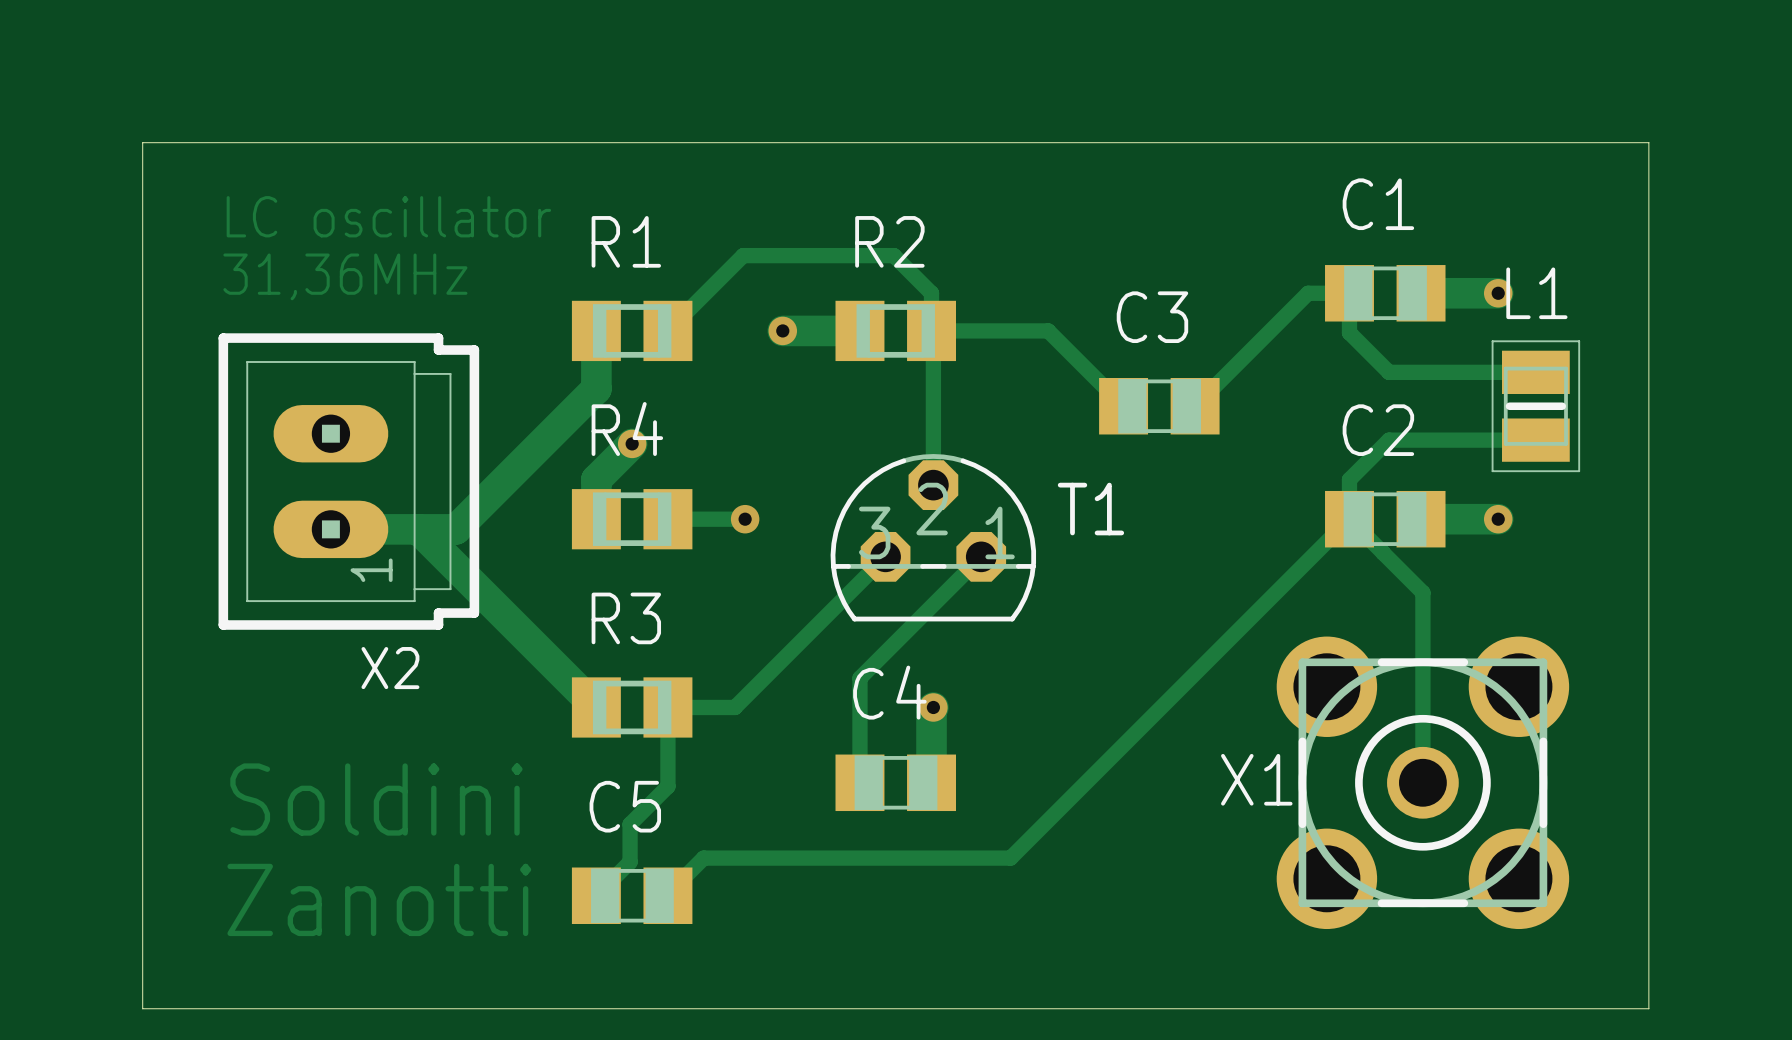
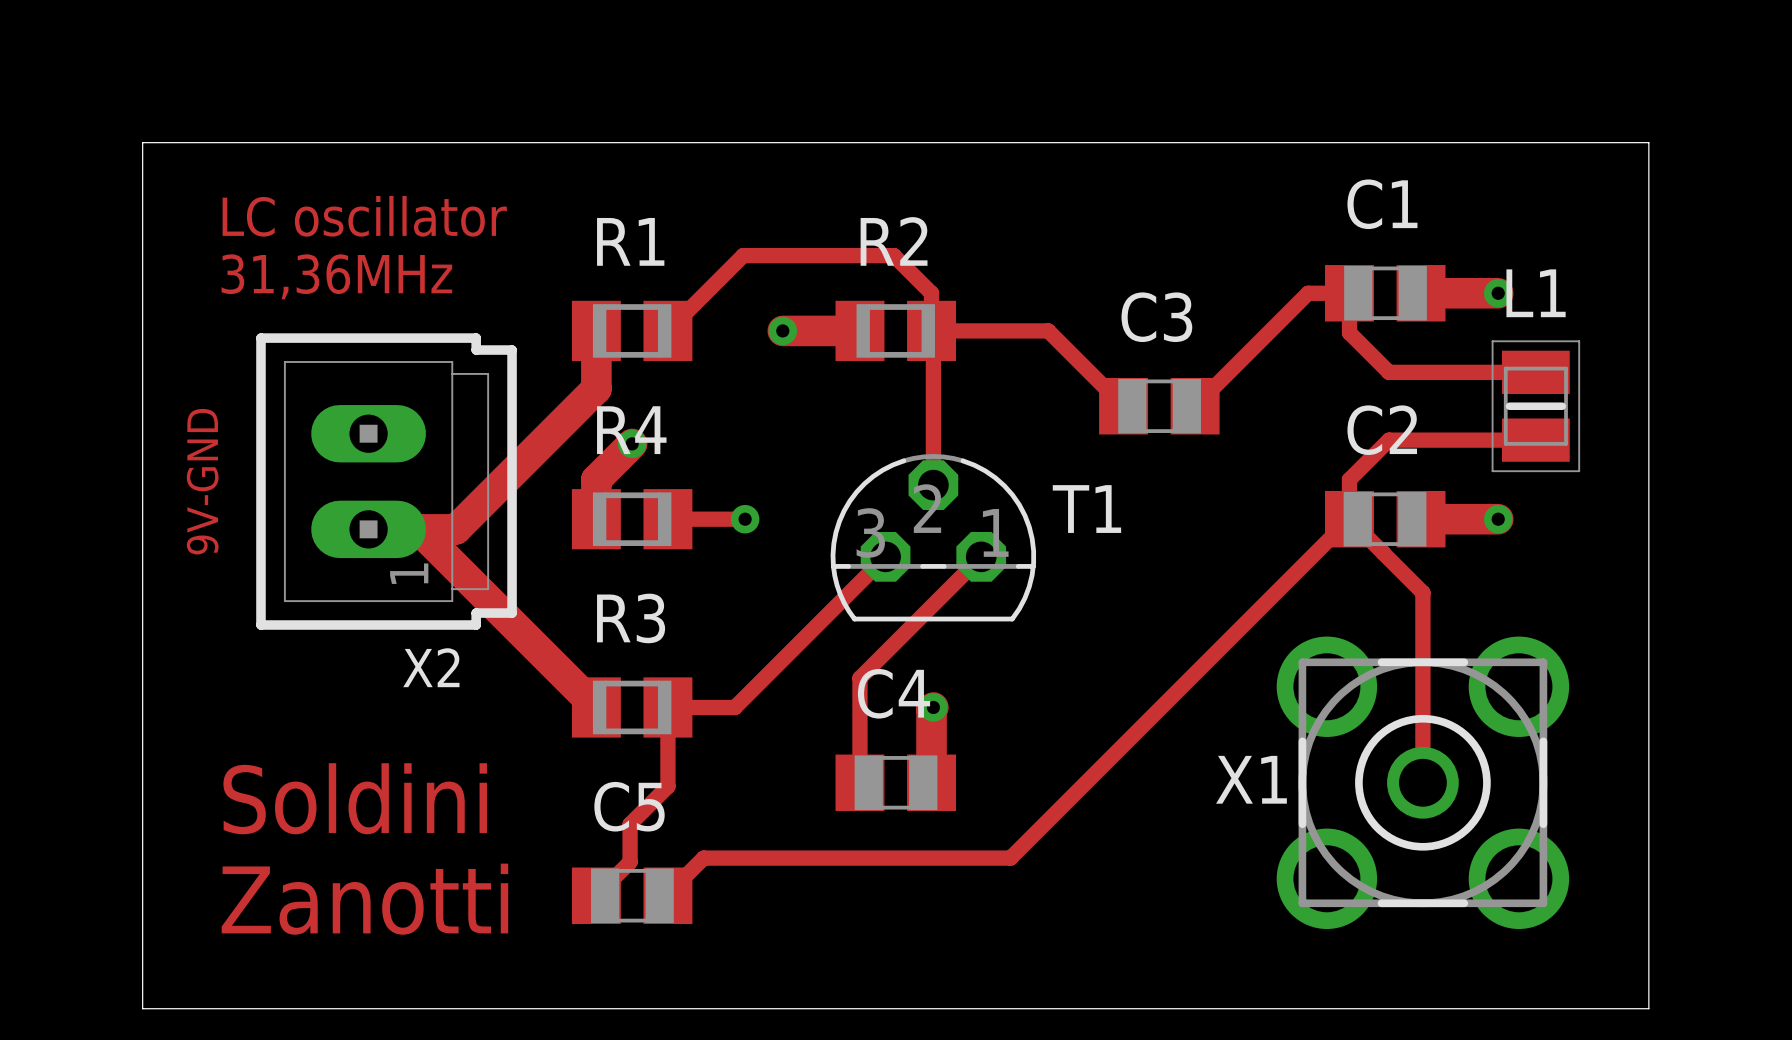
text: none -> 9V-GND (202, 481)
X2 position: (348, 481) -> (386, 481)

